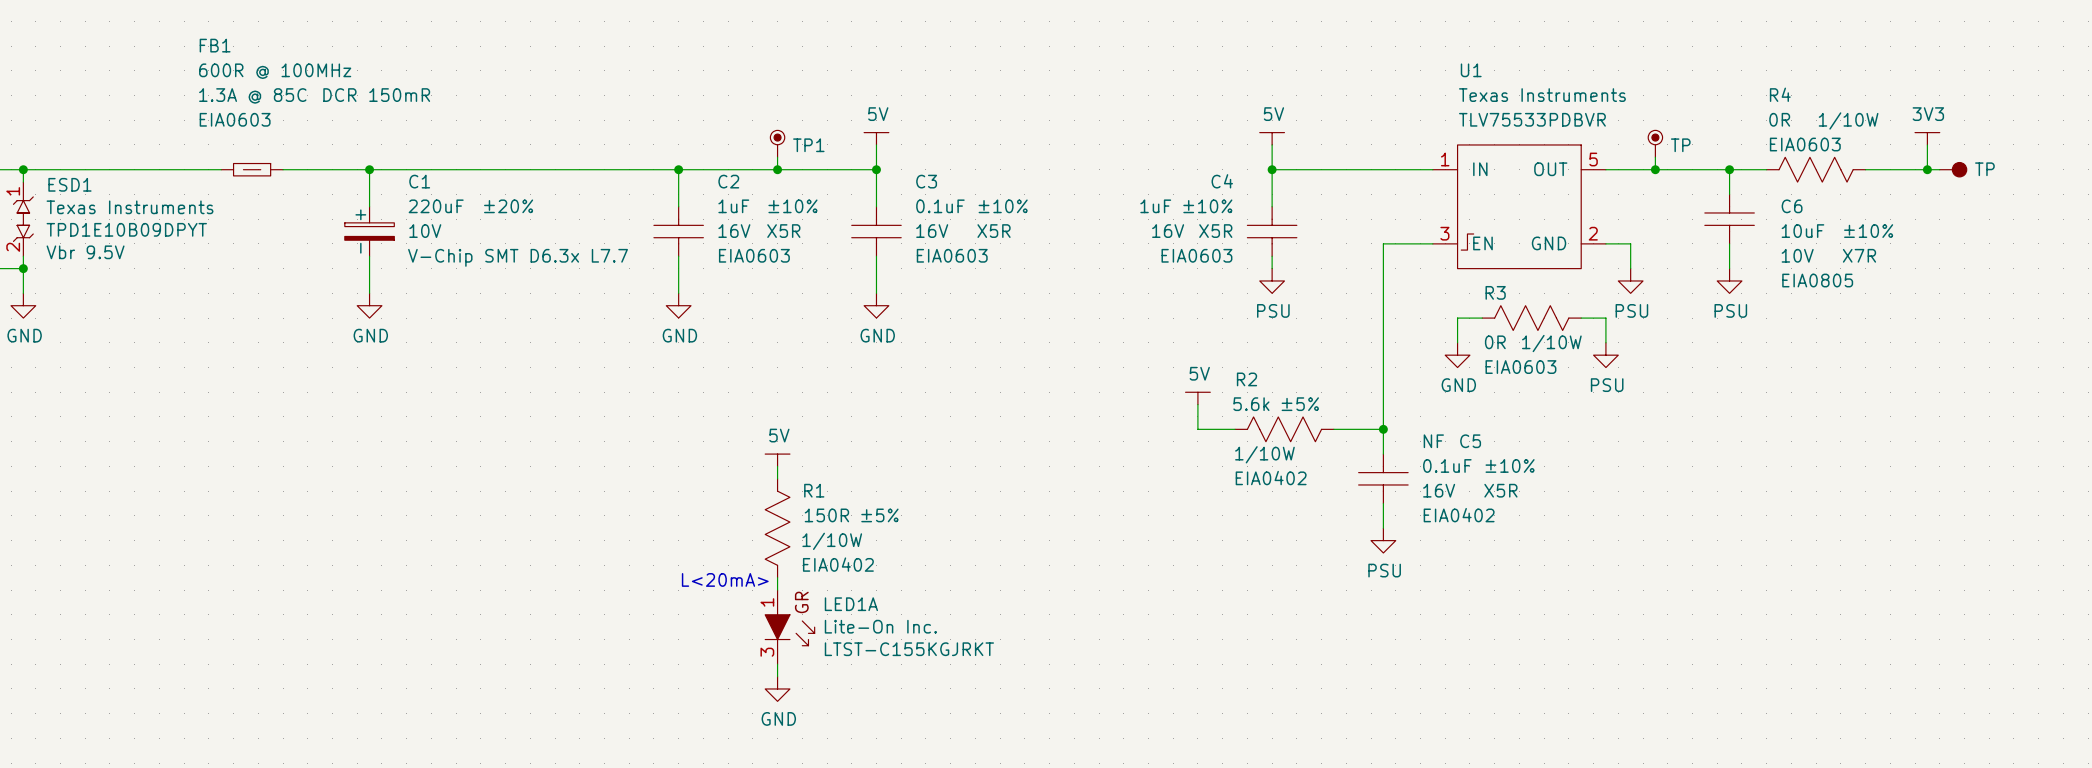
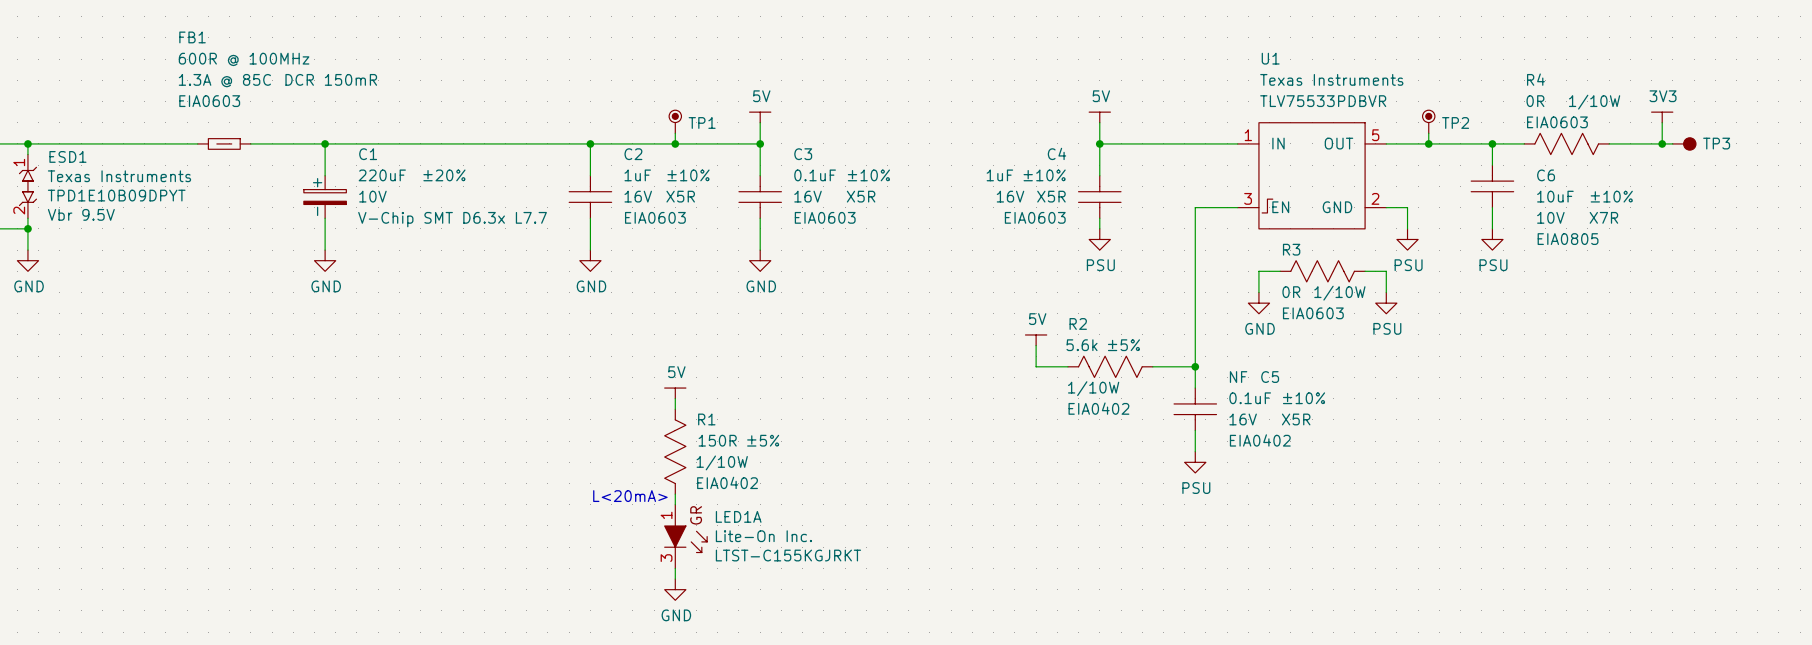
TP name: TP (1680, 145) -> TP2 (1455, 122)
TP name: TP (1984, 169) -> TP3 (1716, 143)

